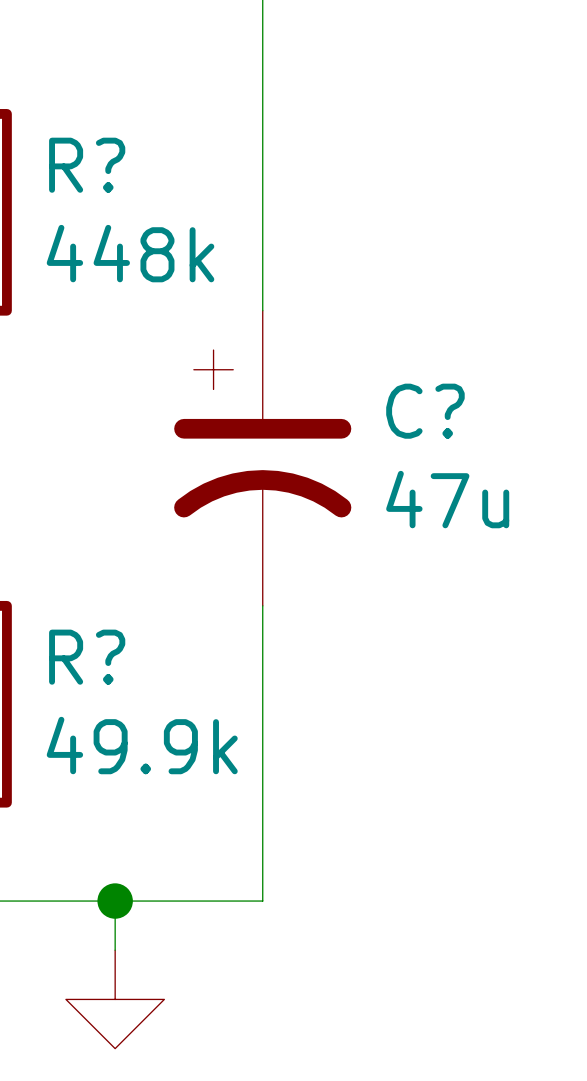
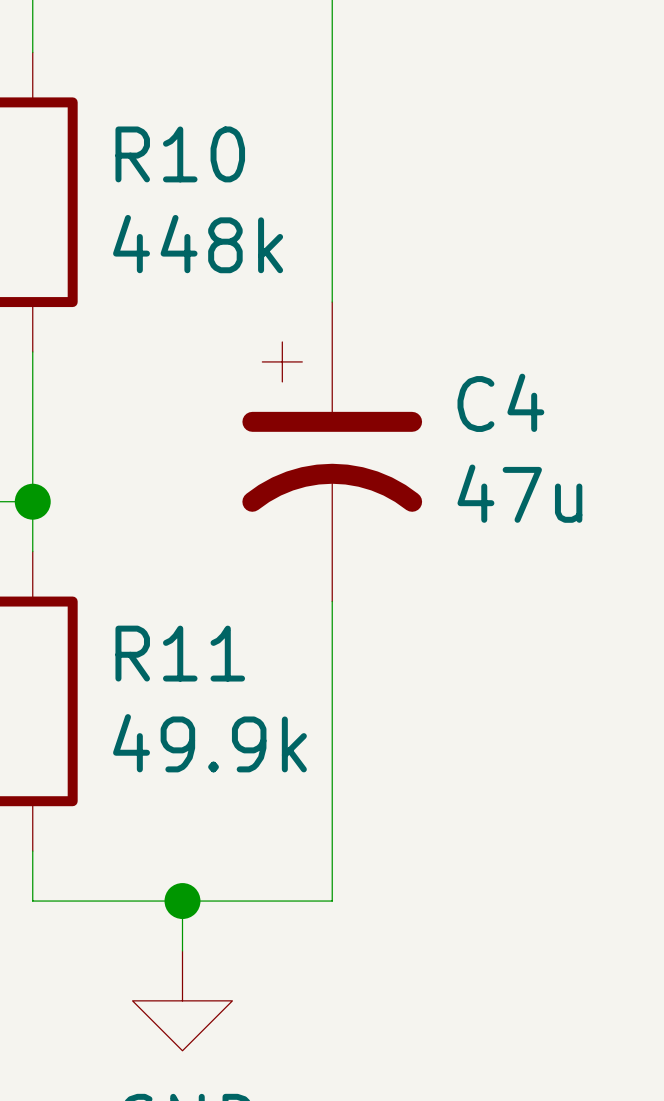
R? name: R? (87, 165) -> R10 (180, 154)
C? name: C? (425, 411) -> C4 (500, 402)
R? name: R? (87, 657) -> R11 (180, 653)

